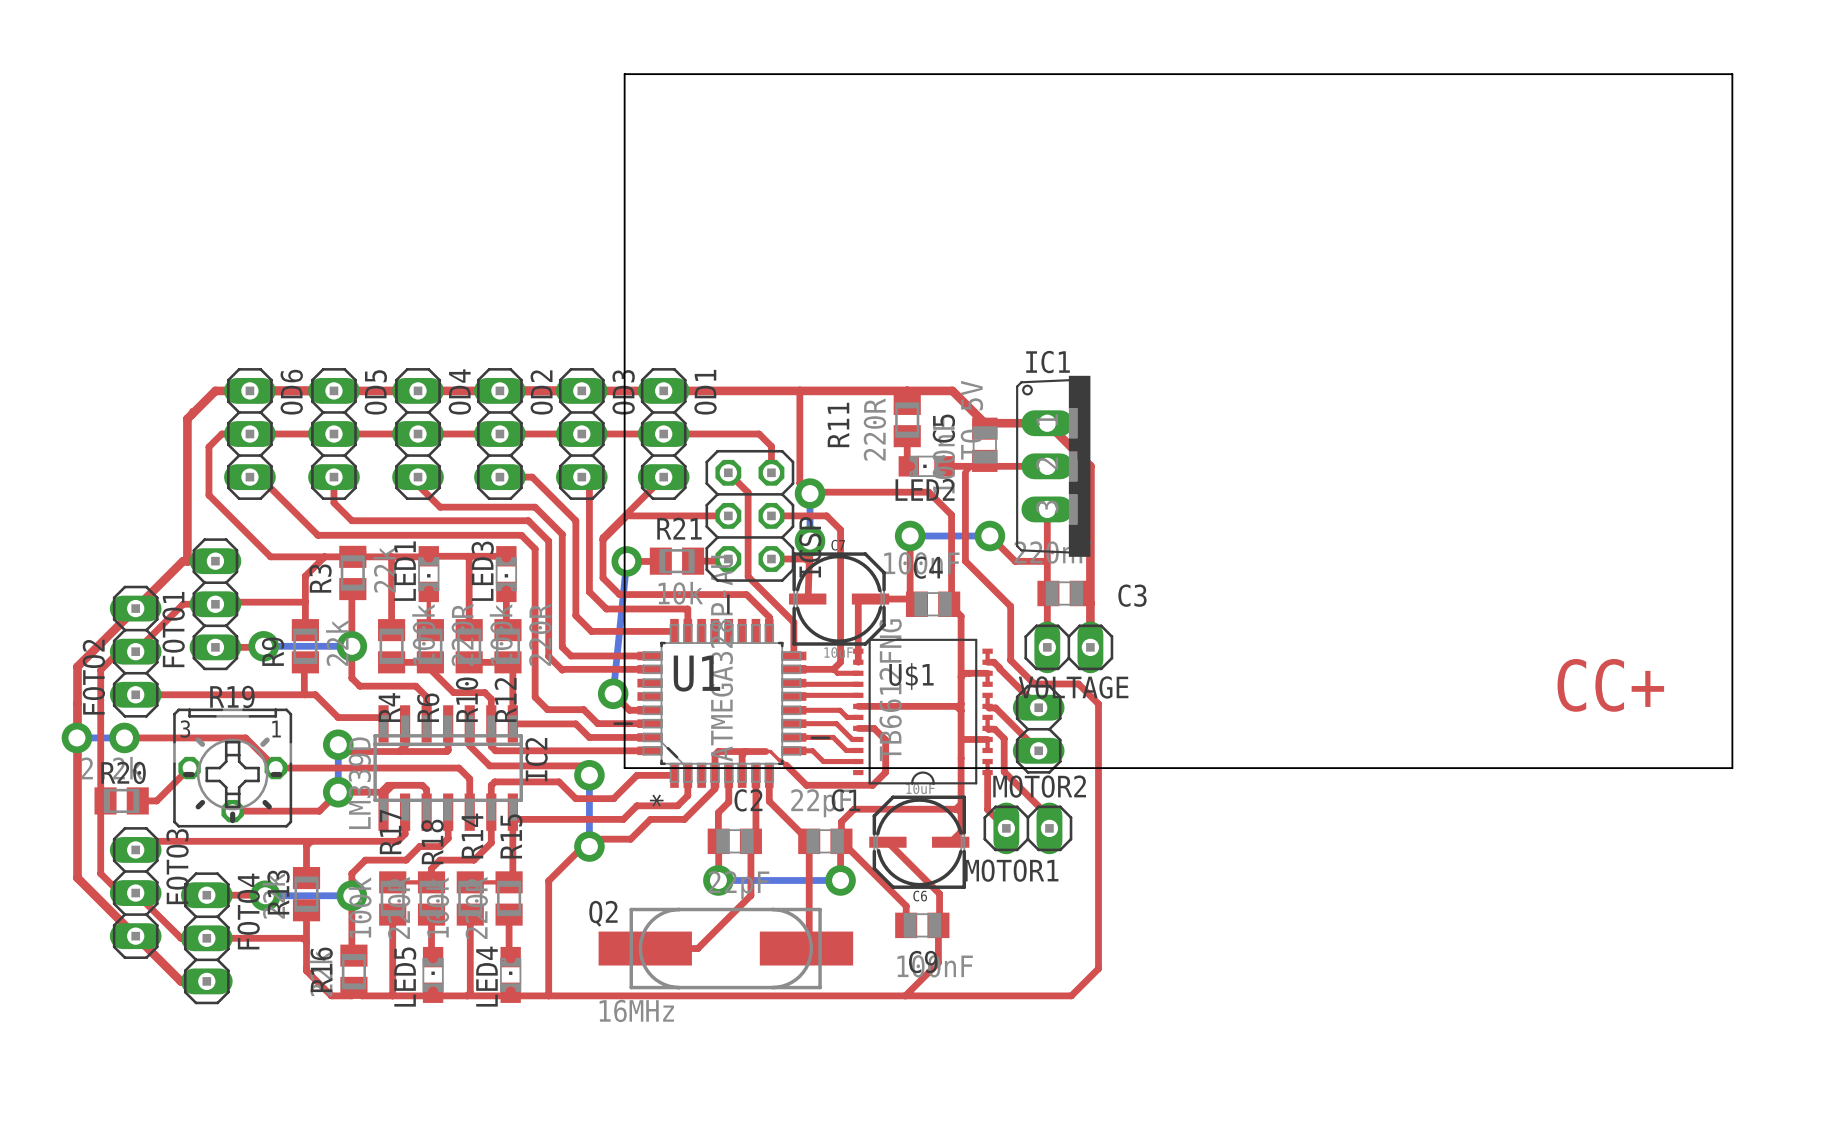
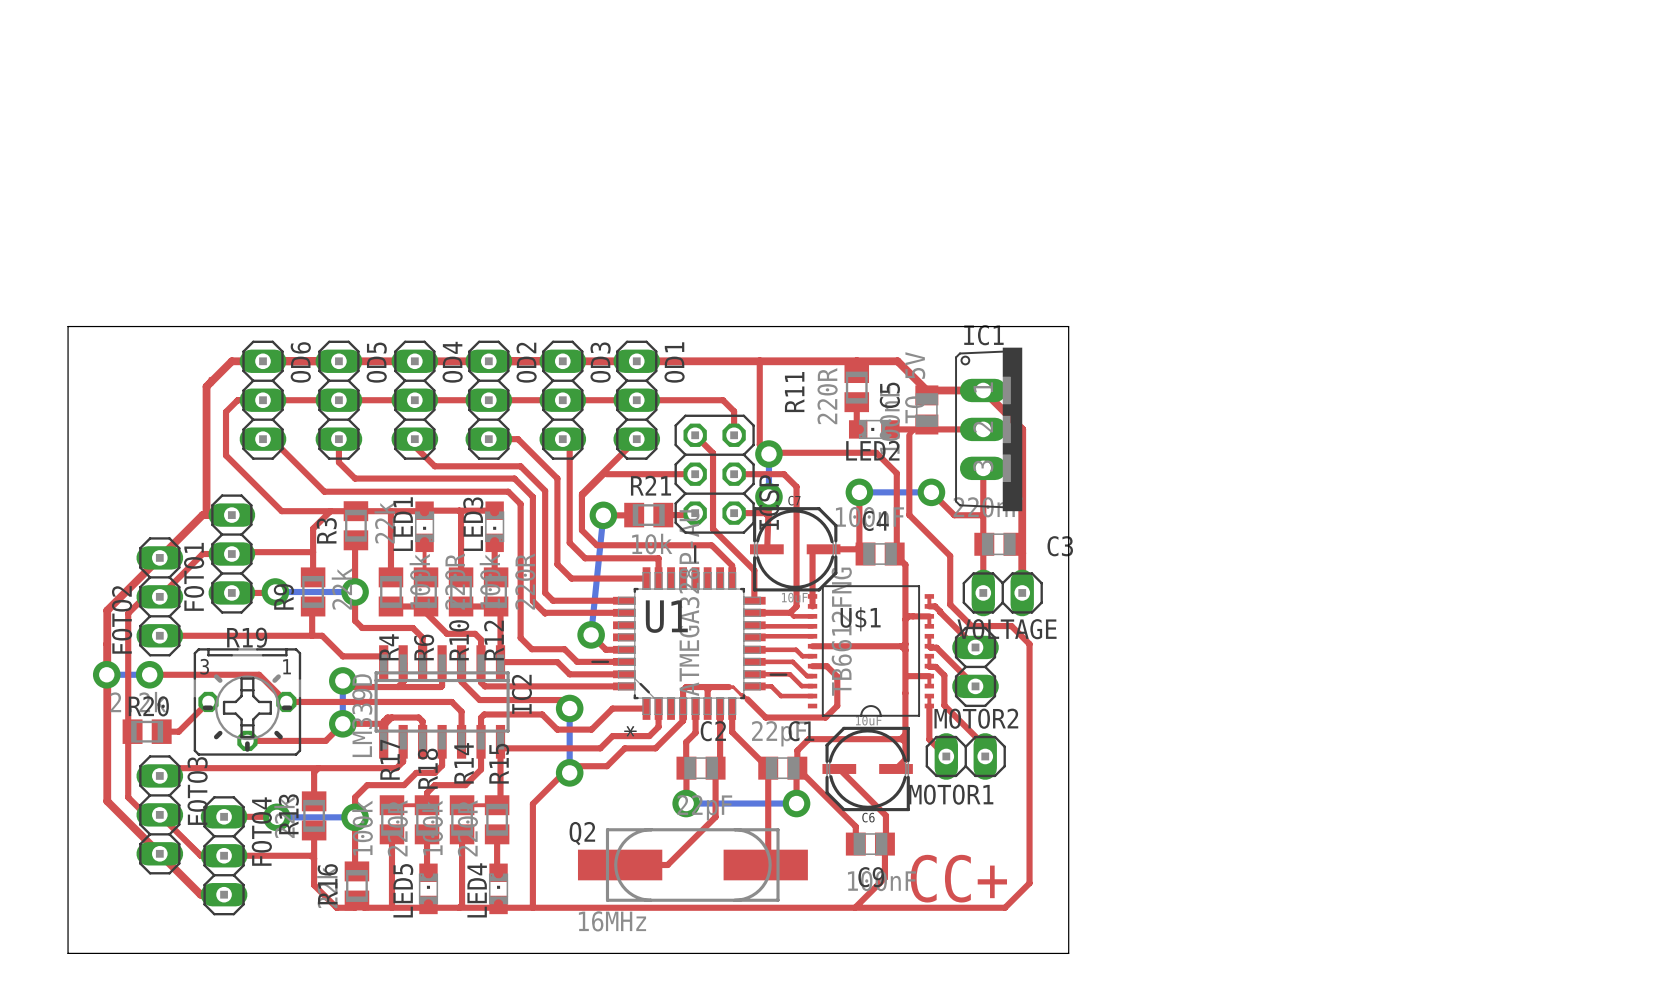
board edge: (624, 74) (1732, 74) (1732, 768) (624, 768) (624, 74) -> none
board edge: none -> (68, 326) (1068, 326) (1068, 953) (68, 953) (68, 326)
text: CC+ (1610, 685) -> none
text: none -> CC+ (958, 878)

